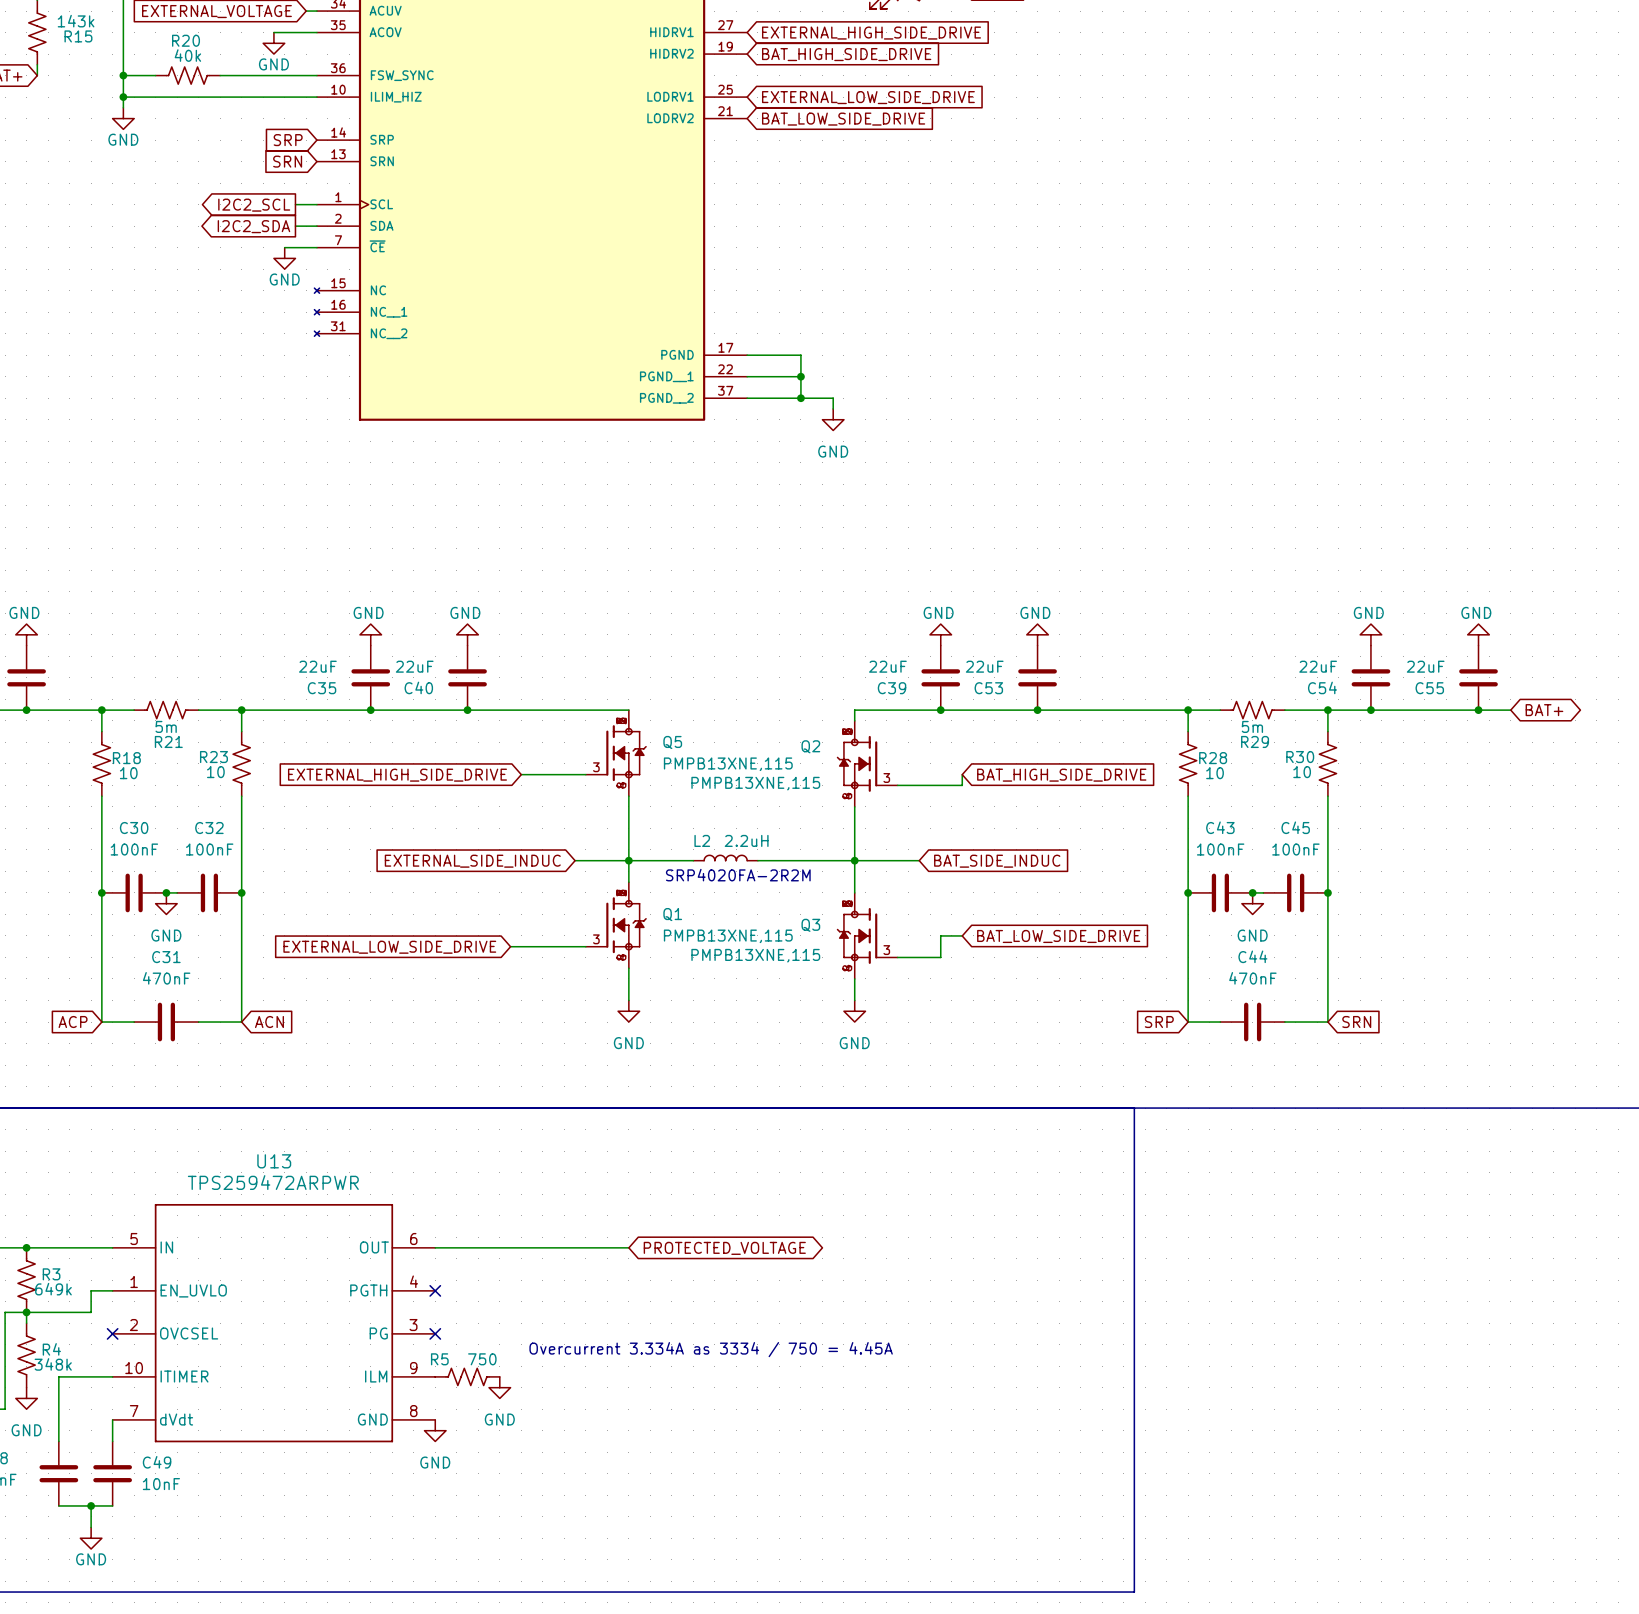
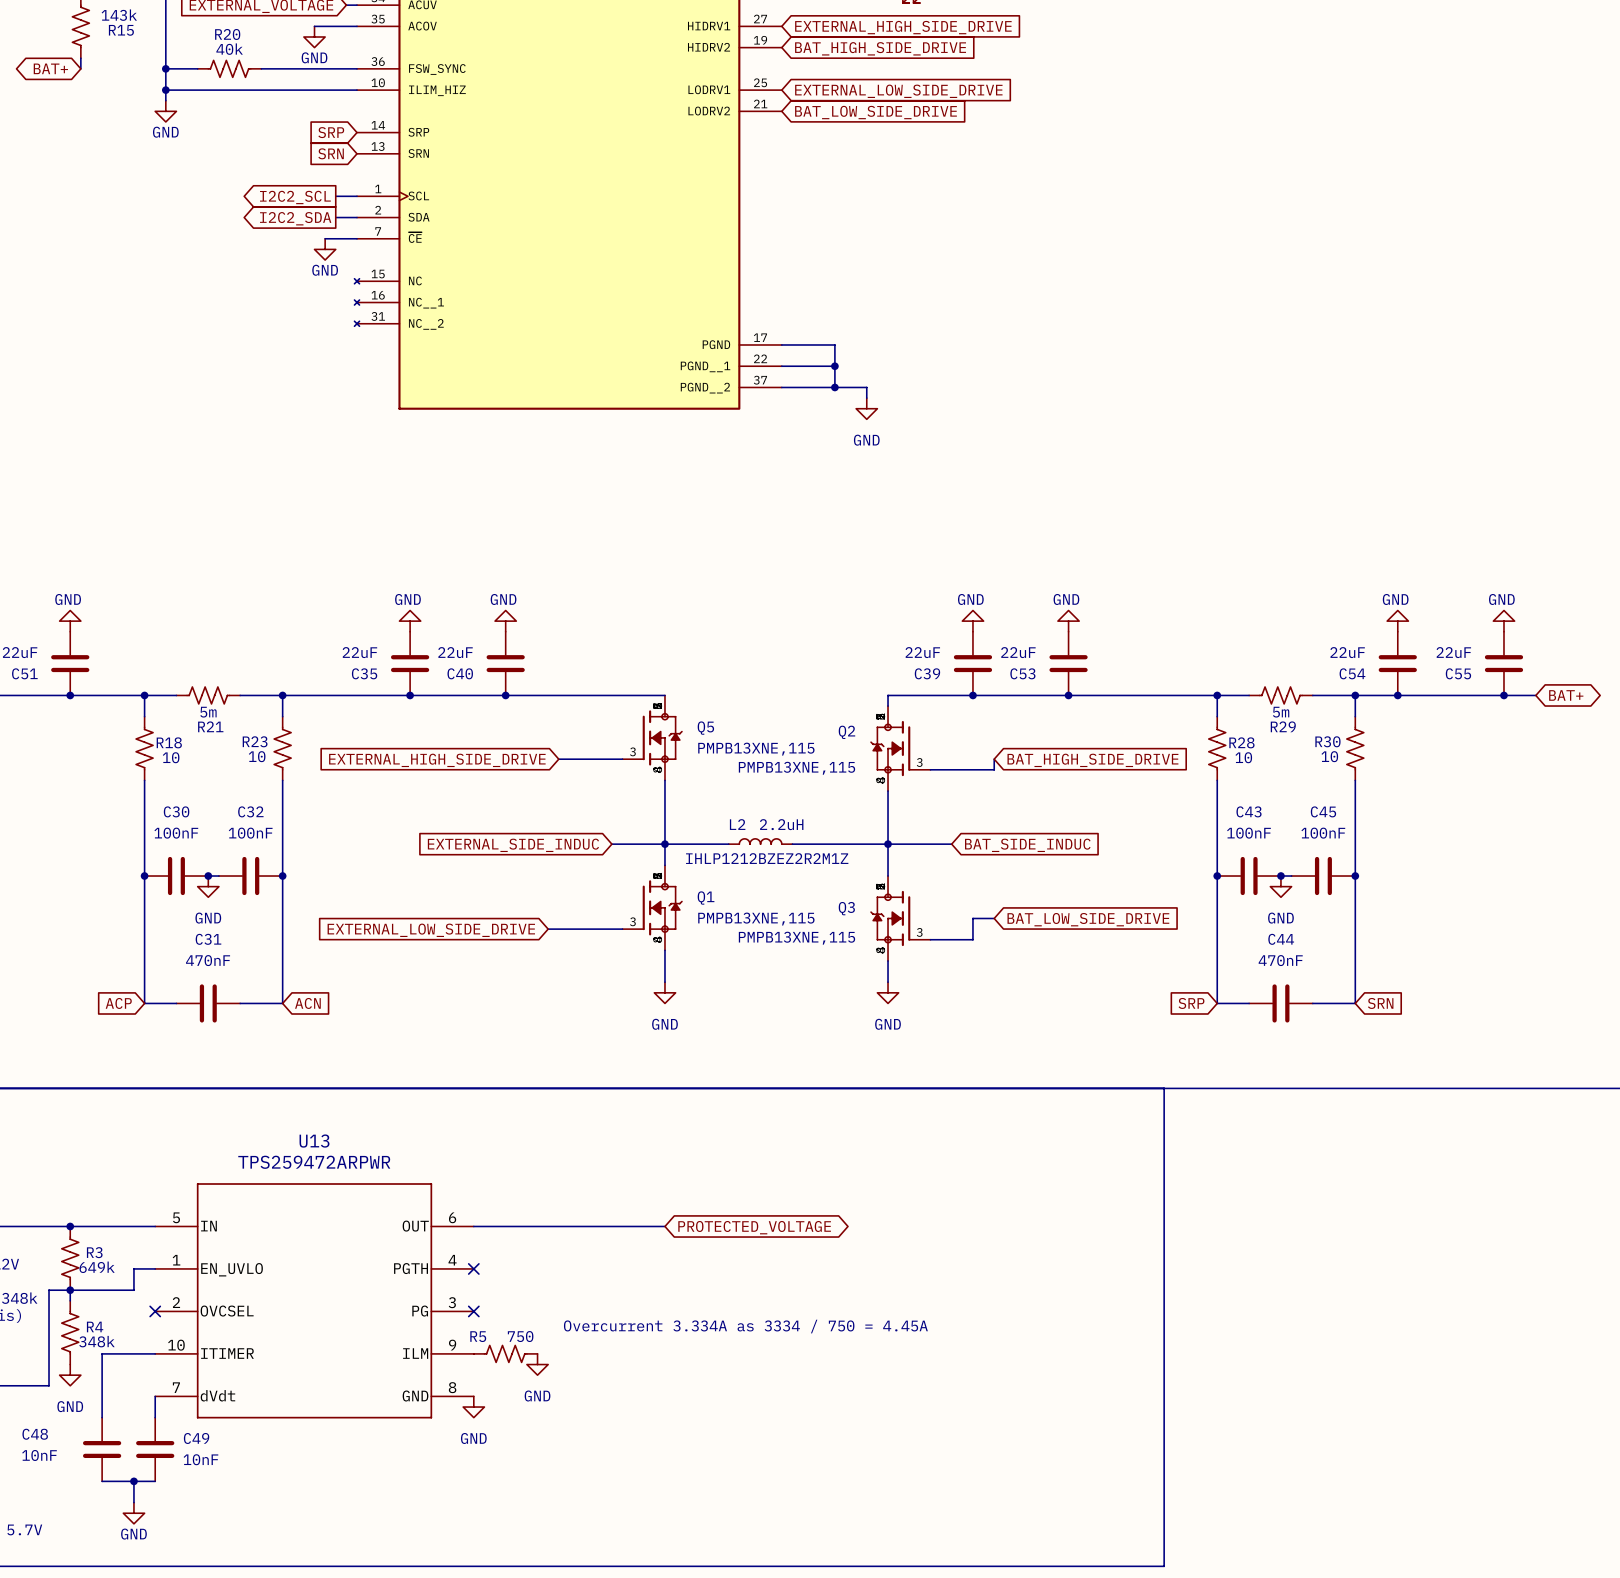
text: SRP4020FA-2R2M (738, 875) -> IHLP1212BZEZ2R2M1Z (767, 858)

